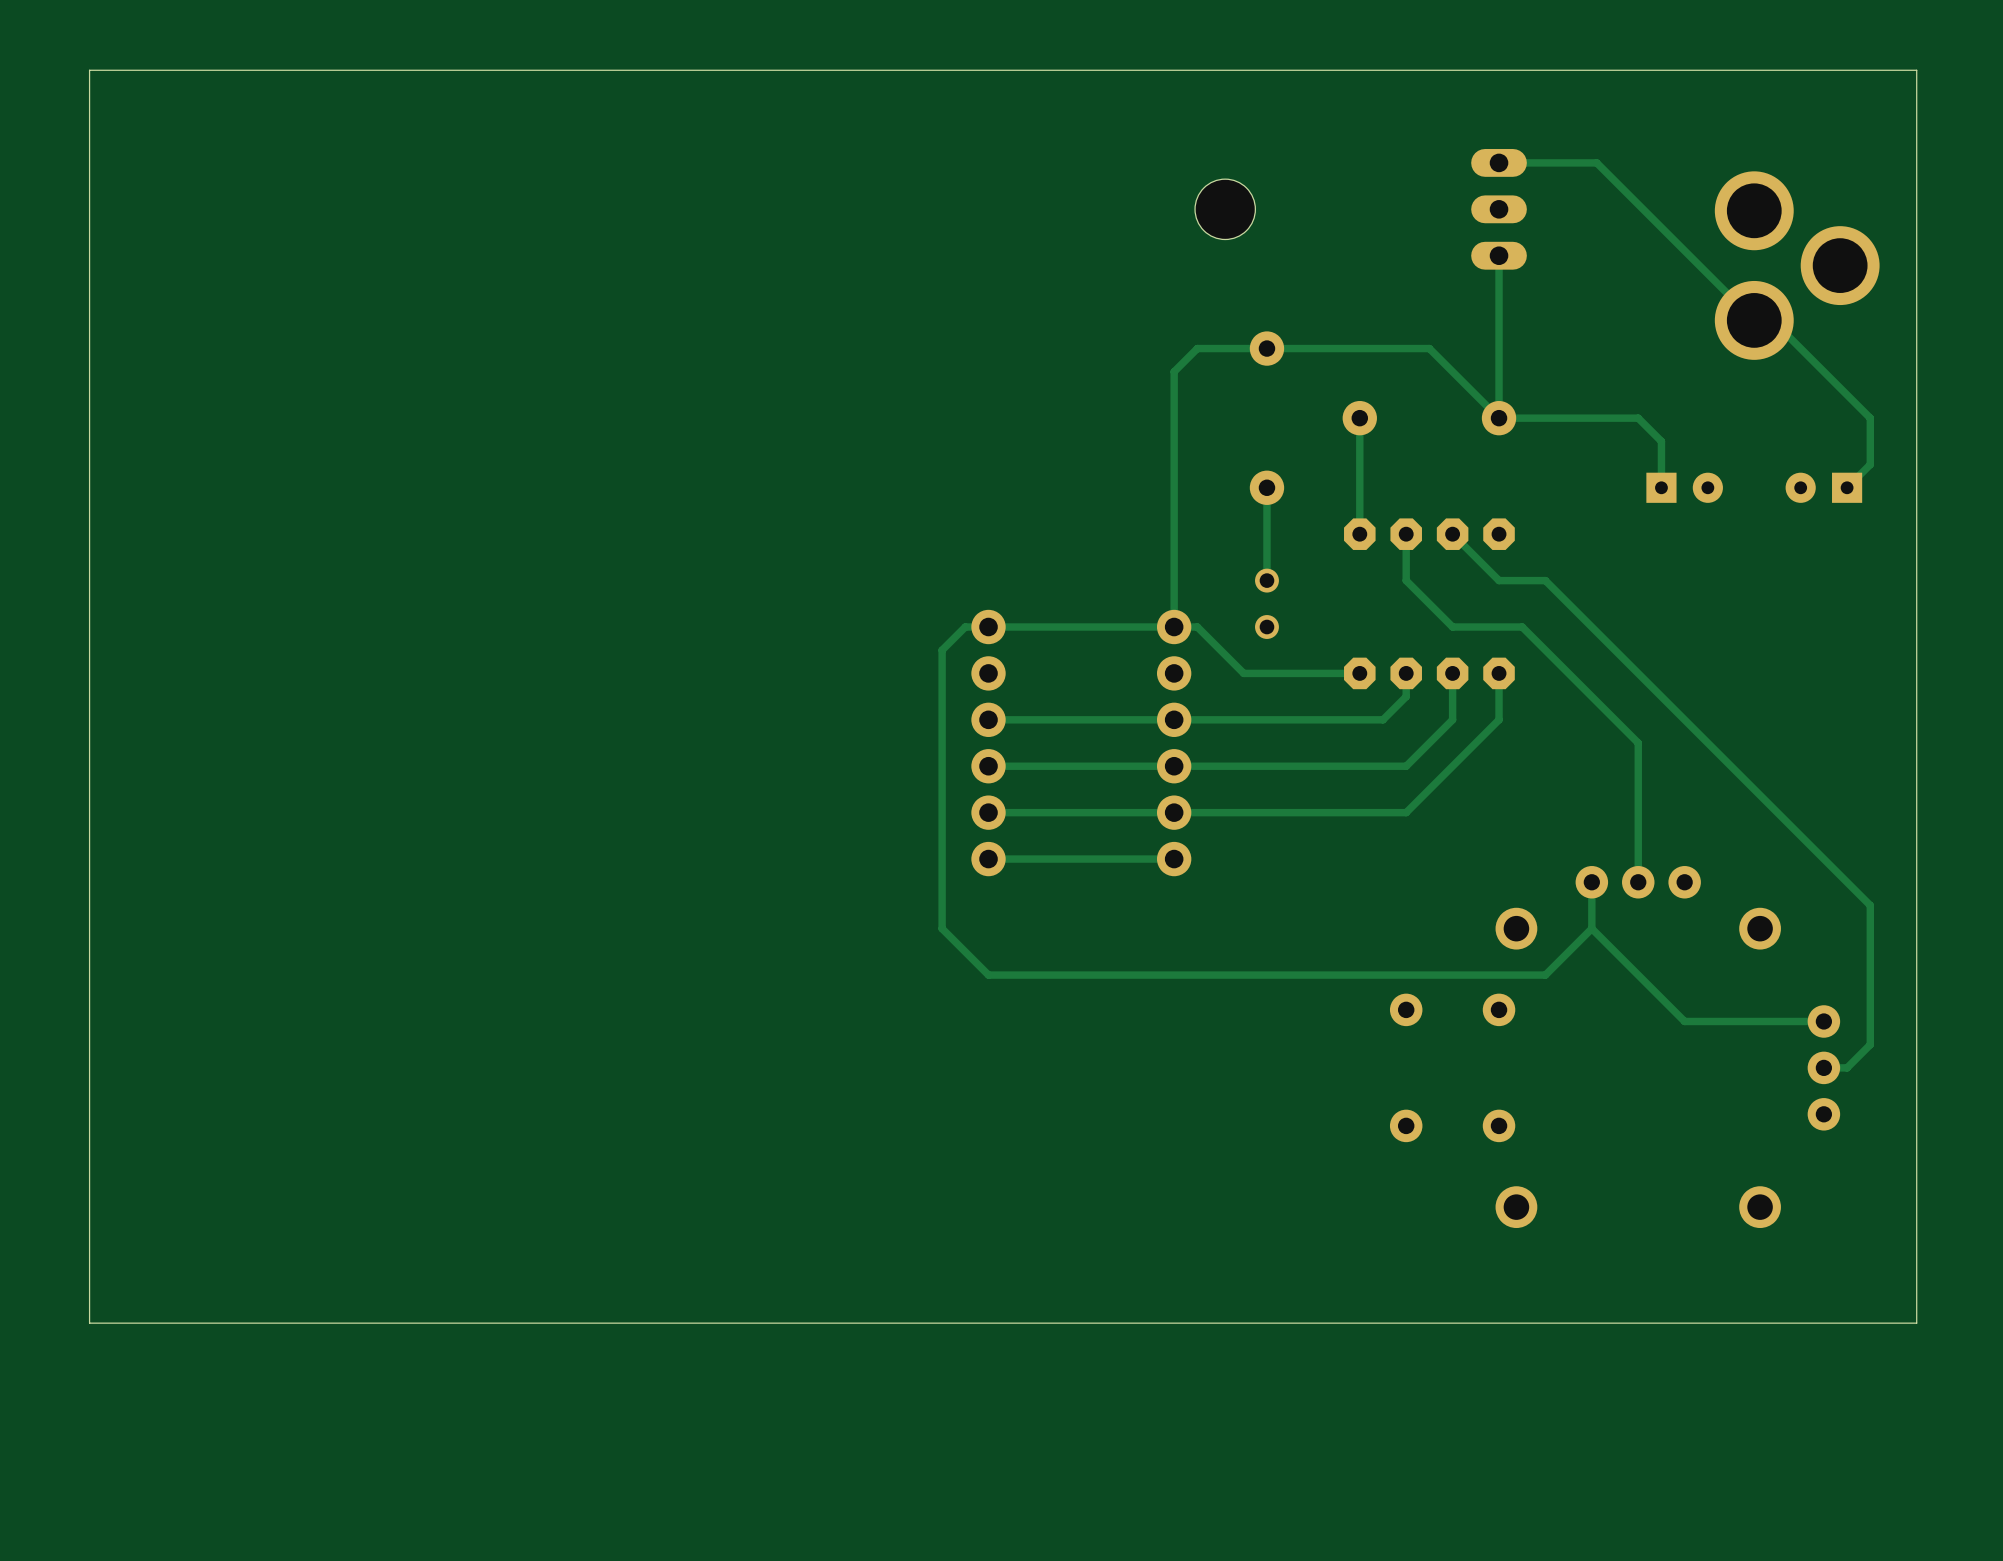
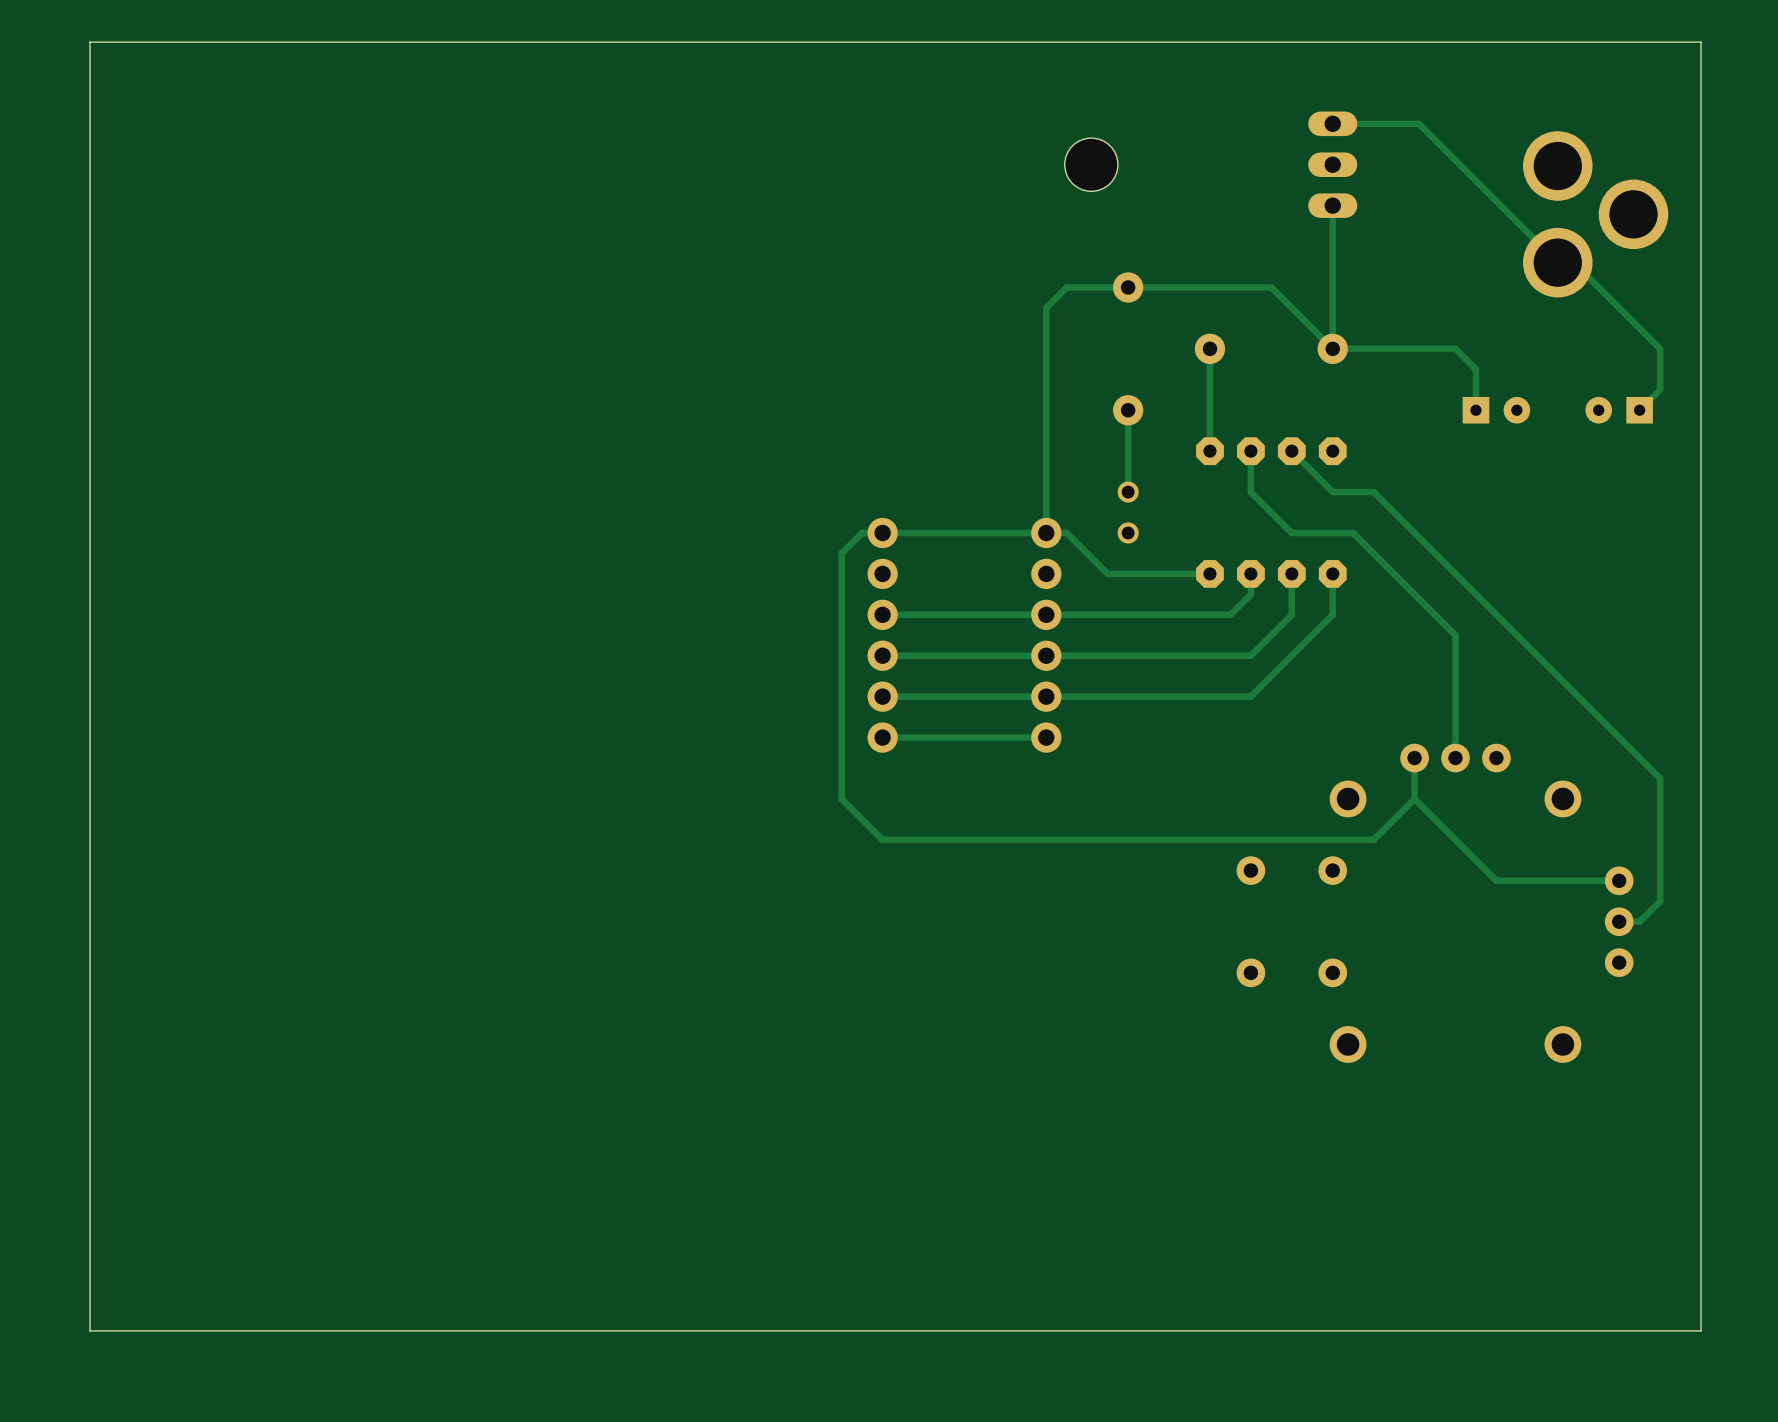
board edge: (1916, 1323) (89, 1323) -> (1701, 1146) (1701, 1330) (90, 1330) (90, 1146)

